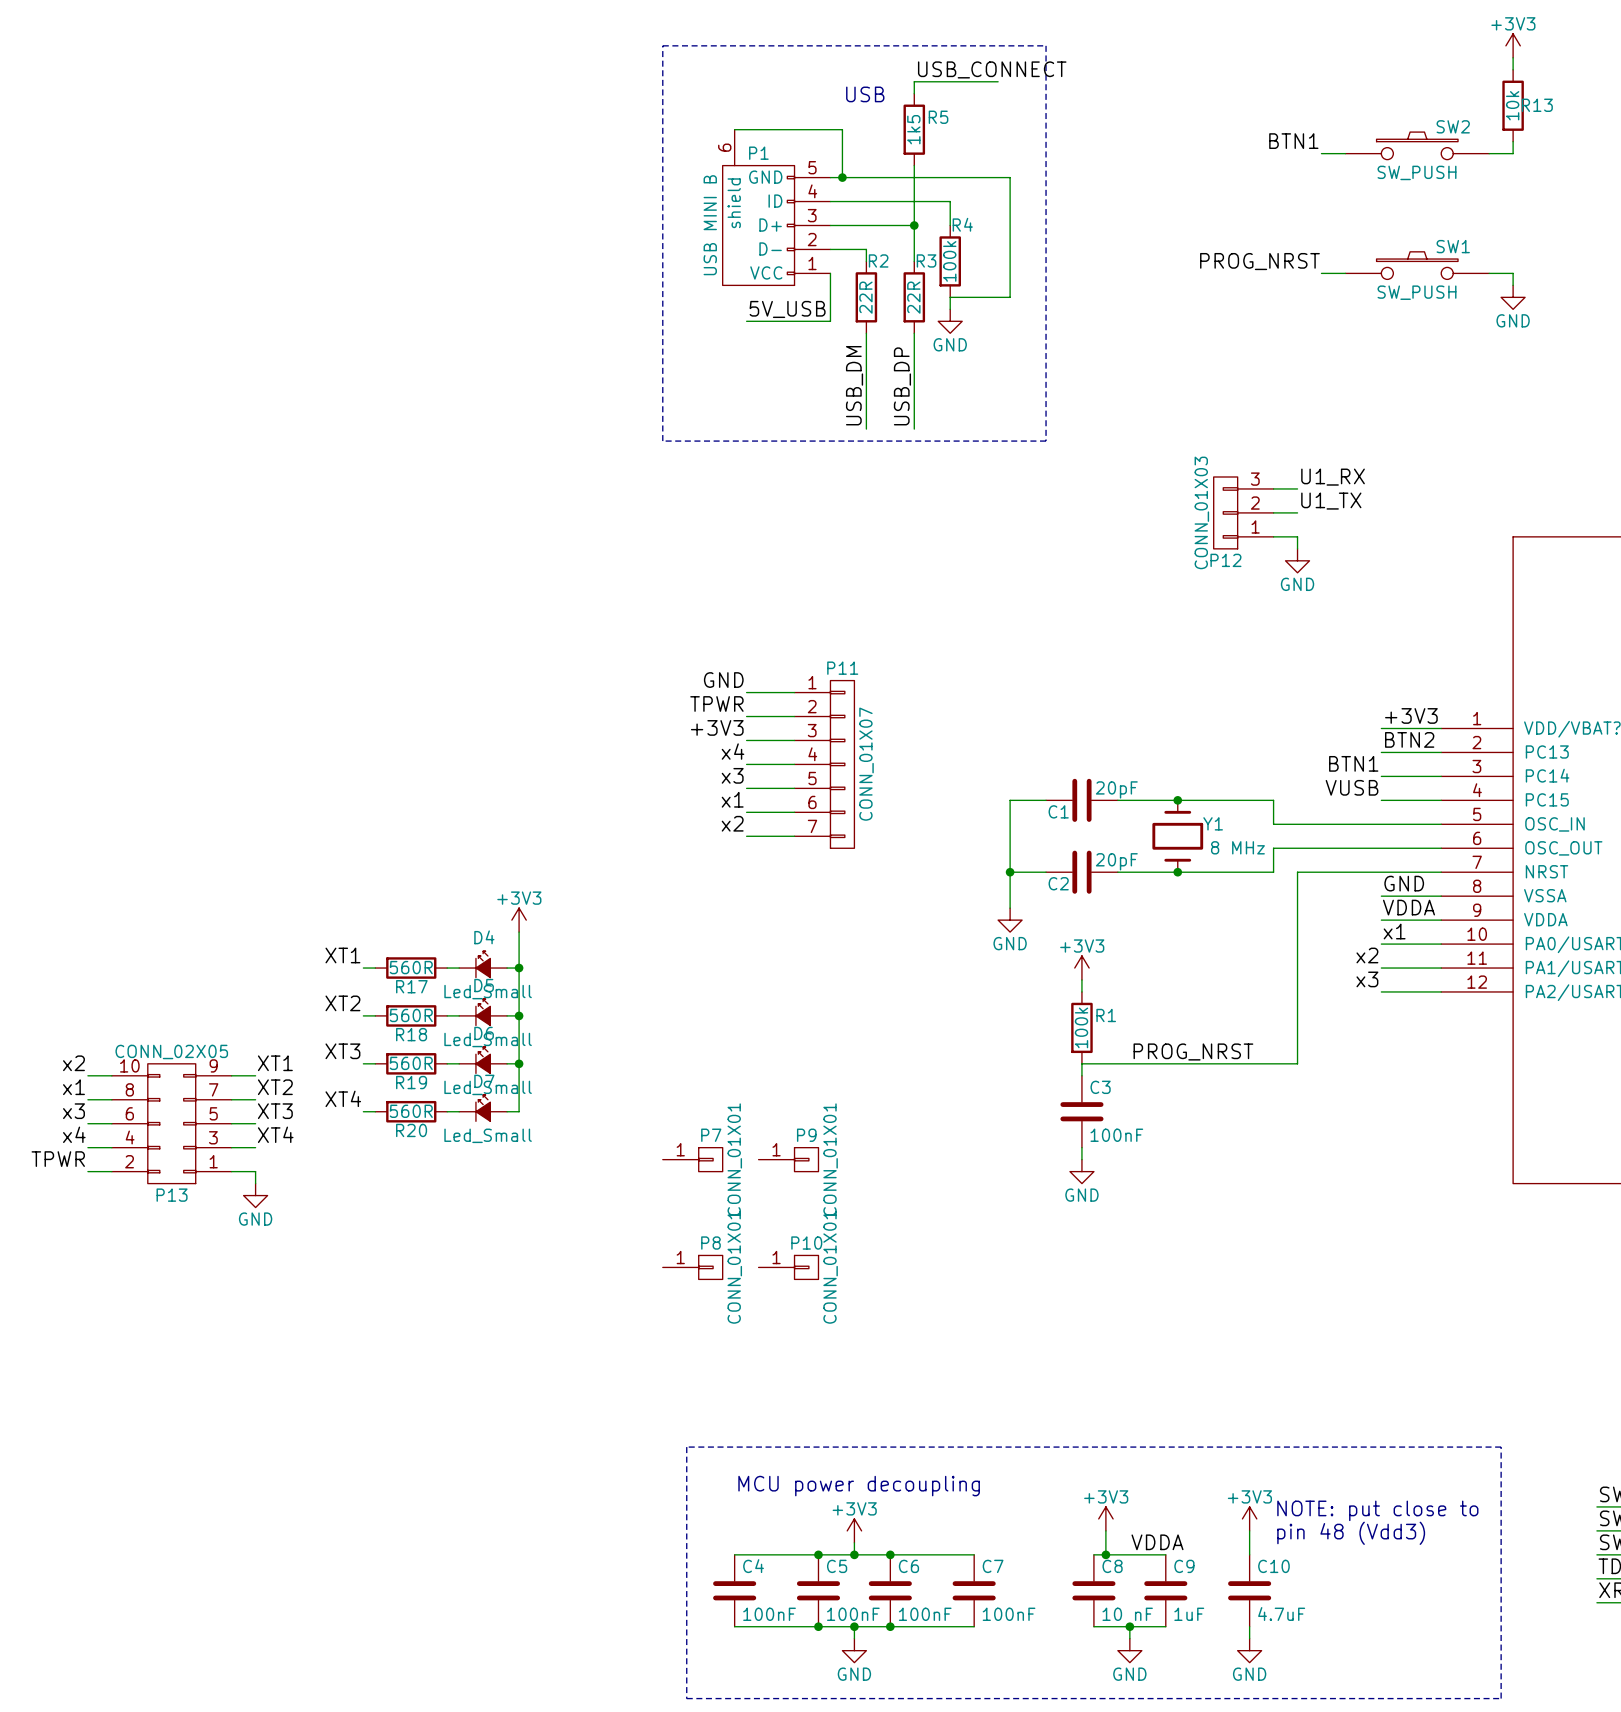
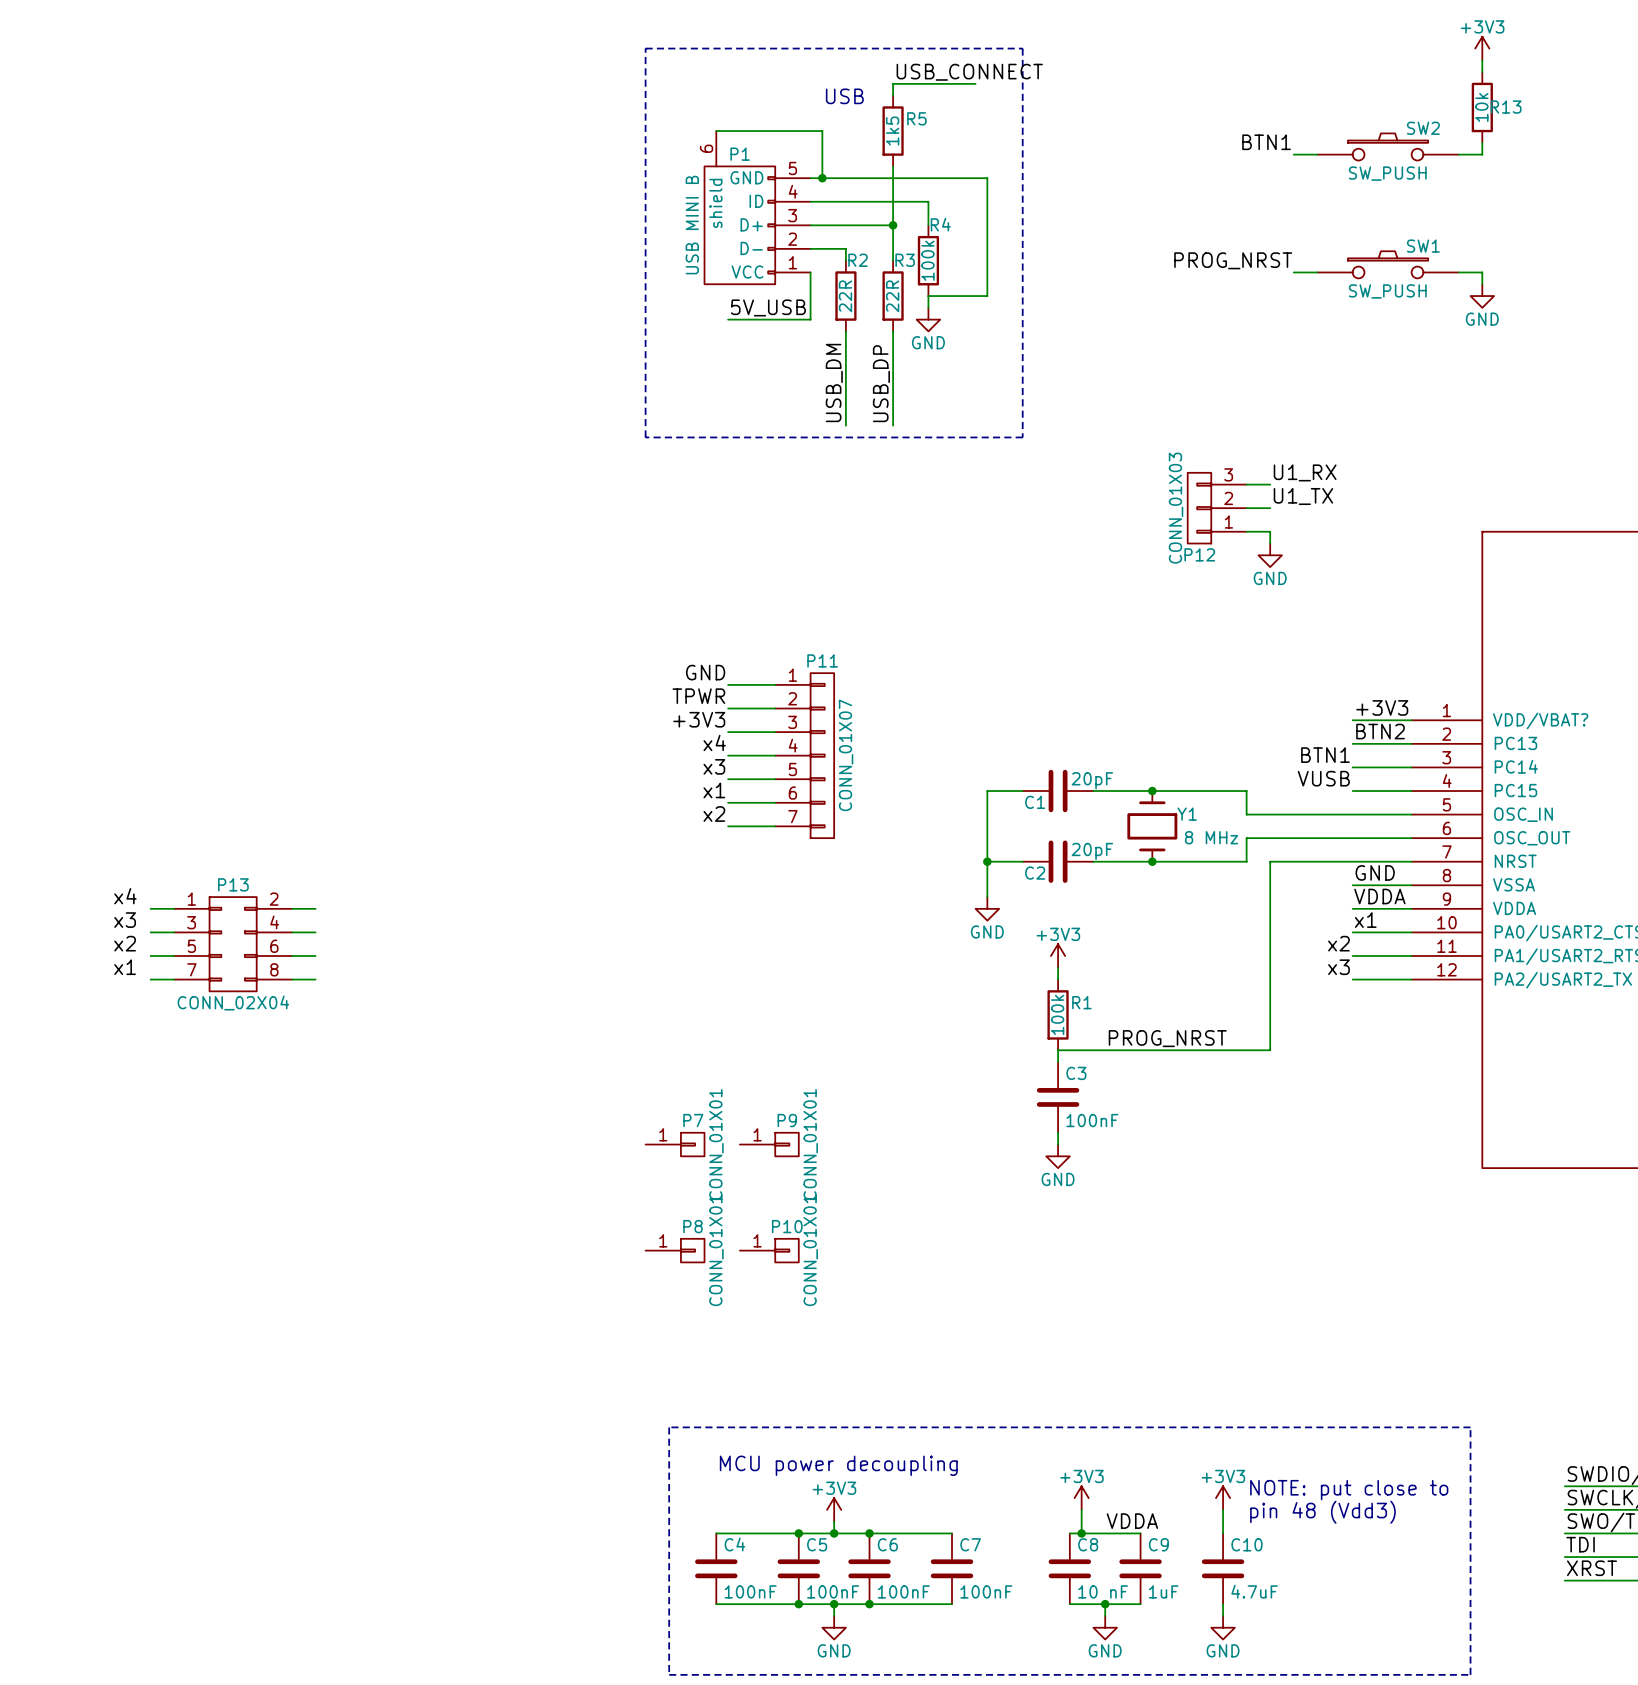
power symbol: +3V3 (519, 920) -> none
wire: (519, 932) (519, 1111) (507, 1111) -> none
label: XT1 (342, 955) -> none
D4: Led_Small (483, 964) -> none
wire: (363, 968) (375, 968) -> none
R17: 560R (411, 968) -> none
wire: (447, 968) (459, 968) -> none
wire: (507, 968) (519, 968) -> none
junction: (519, 968) -> none
label: XT2 (342, 1003) -> none
D5: Led_Small (483, 1012) -> none
wire: (363, 1015) (375, 1015) -> none
R18: 560R (411, 1015) -> none
wire: (447, 1015) (459, 1015) -> none
wire: (507, 1015) (519, 1015) -> none
junction: (519, 1015) -> none
P13 value: CONN_02X05 (171, 1051) -> CONN_02X04 (233, 1002)
label: XT3 (342, 1051) -> none
D6: Led_Small (483, 1060) -> none
label position: x2 (73, 1063) -> x2 (125, 943)
P13 symbol: [111, 1063, 232, 1184] -> [174, 897, 293, 992]
label: XT1 (275, 1063) -> none
wire: (363, 1063) (375, 1063) -> none
R19: 560R (411, 1063) -> none
wire: (447, 1063) (459, 1063) -> none
wire: (507, 1063) (519, 1063) -> none
junction: (519, 1063) -> none
wire: (87, 1075) (111, 1075) -> (150, 908) (174, 908)
wire: (231, 1075) (255, 1075) -> (292, 908) (315, 908)
label position: x1 (73, 1087) -> x1 (125, 967)
label: XT2 (275, 1087) -> none
label: XT4 (343, 1098) -> none
wire: (87, 1099) (111, 1099) -> (150, 932) (174, 932)
wire: (231, 1099) (255, 1099) -> (292, 932) (315, 932)
D7: Led_Small (483, 1108) -> none
label position: x3 (73, 1111) -> x3 (125, 920)
label: XT3 (275, 1111) -> none
wire: (363, 1111) (375, 1111) -> none
R20: 560R (411, 1111) -> none
wire: (447, 1111) (459, 1111) -> none
wire: (87, 1123) (111, 1123) -> (150, 955) (174, 955)
wire: (231, 1123) (255, 1123) -> (292, 955) (315, 955)
label position: x4 (74, 1134) -> x4 (125, 896)
label: XT4 (275, 1134) -> none
wire: (87, 1147) (111, 1147) -> (150, 979) (174, 979)
wire: (231, 1147) (255, 1147) -> (292, 979) (315, 979)
label: TPWR (58, 1159) -> none
wire: (87, 1171) (111, 1171) -> none
wire: (231, 1171) (255, 1171) (255, 1183) -> none
P13 name position: P13 (172, 1195) -> P13 (233, 884)
power symbol: GND (255, 1195) -> none

